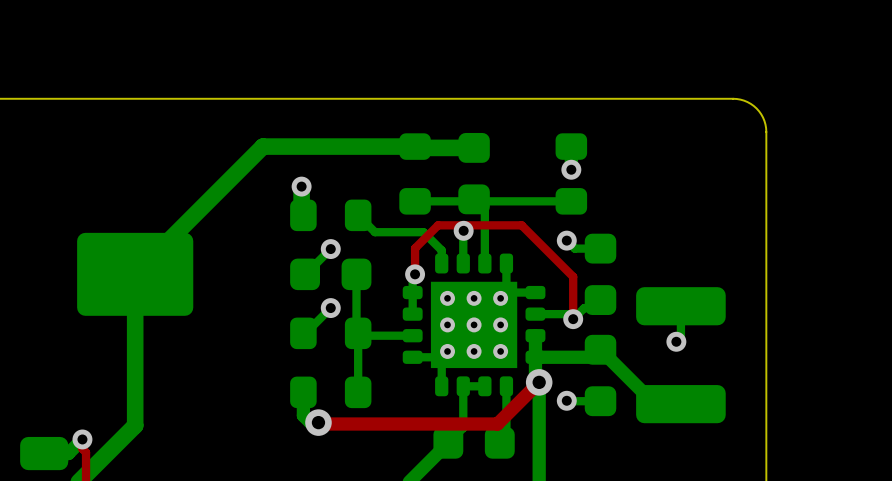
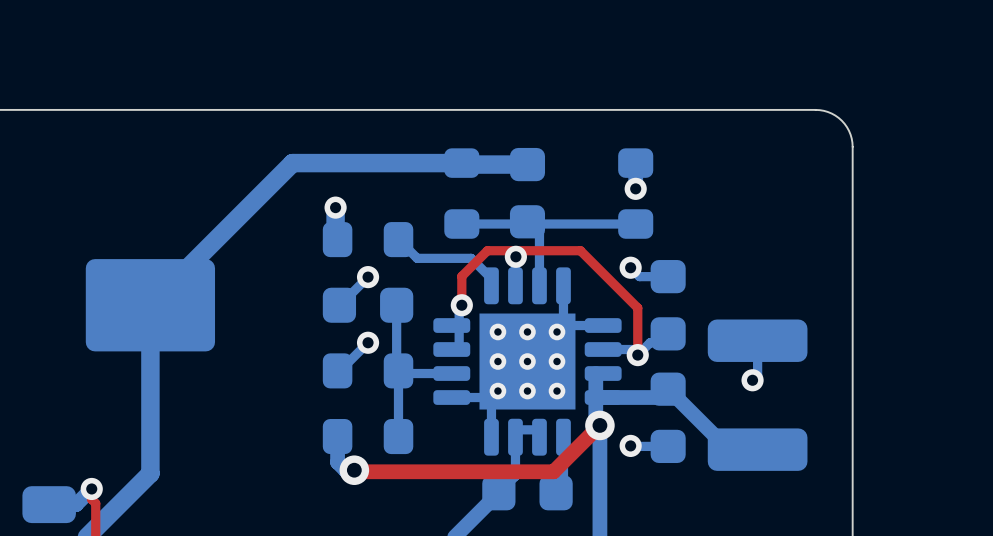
part footprint: [402, 253, 546, 397] -> [433, 267, 622, 456]

